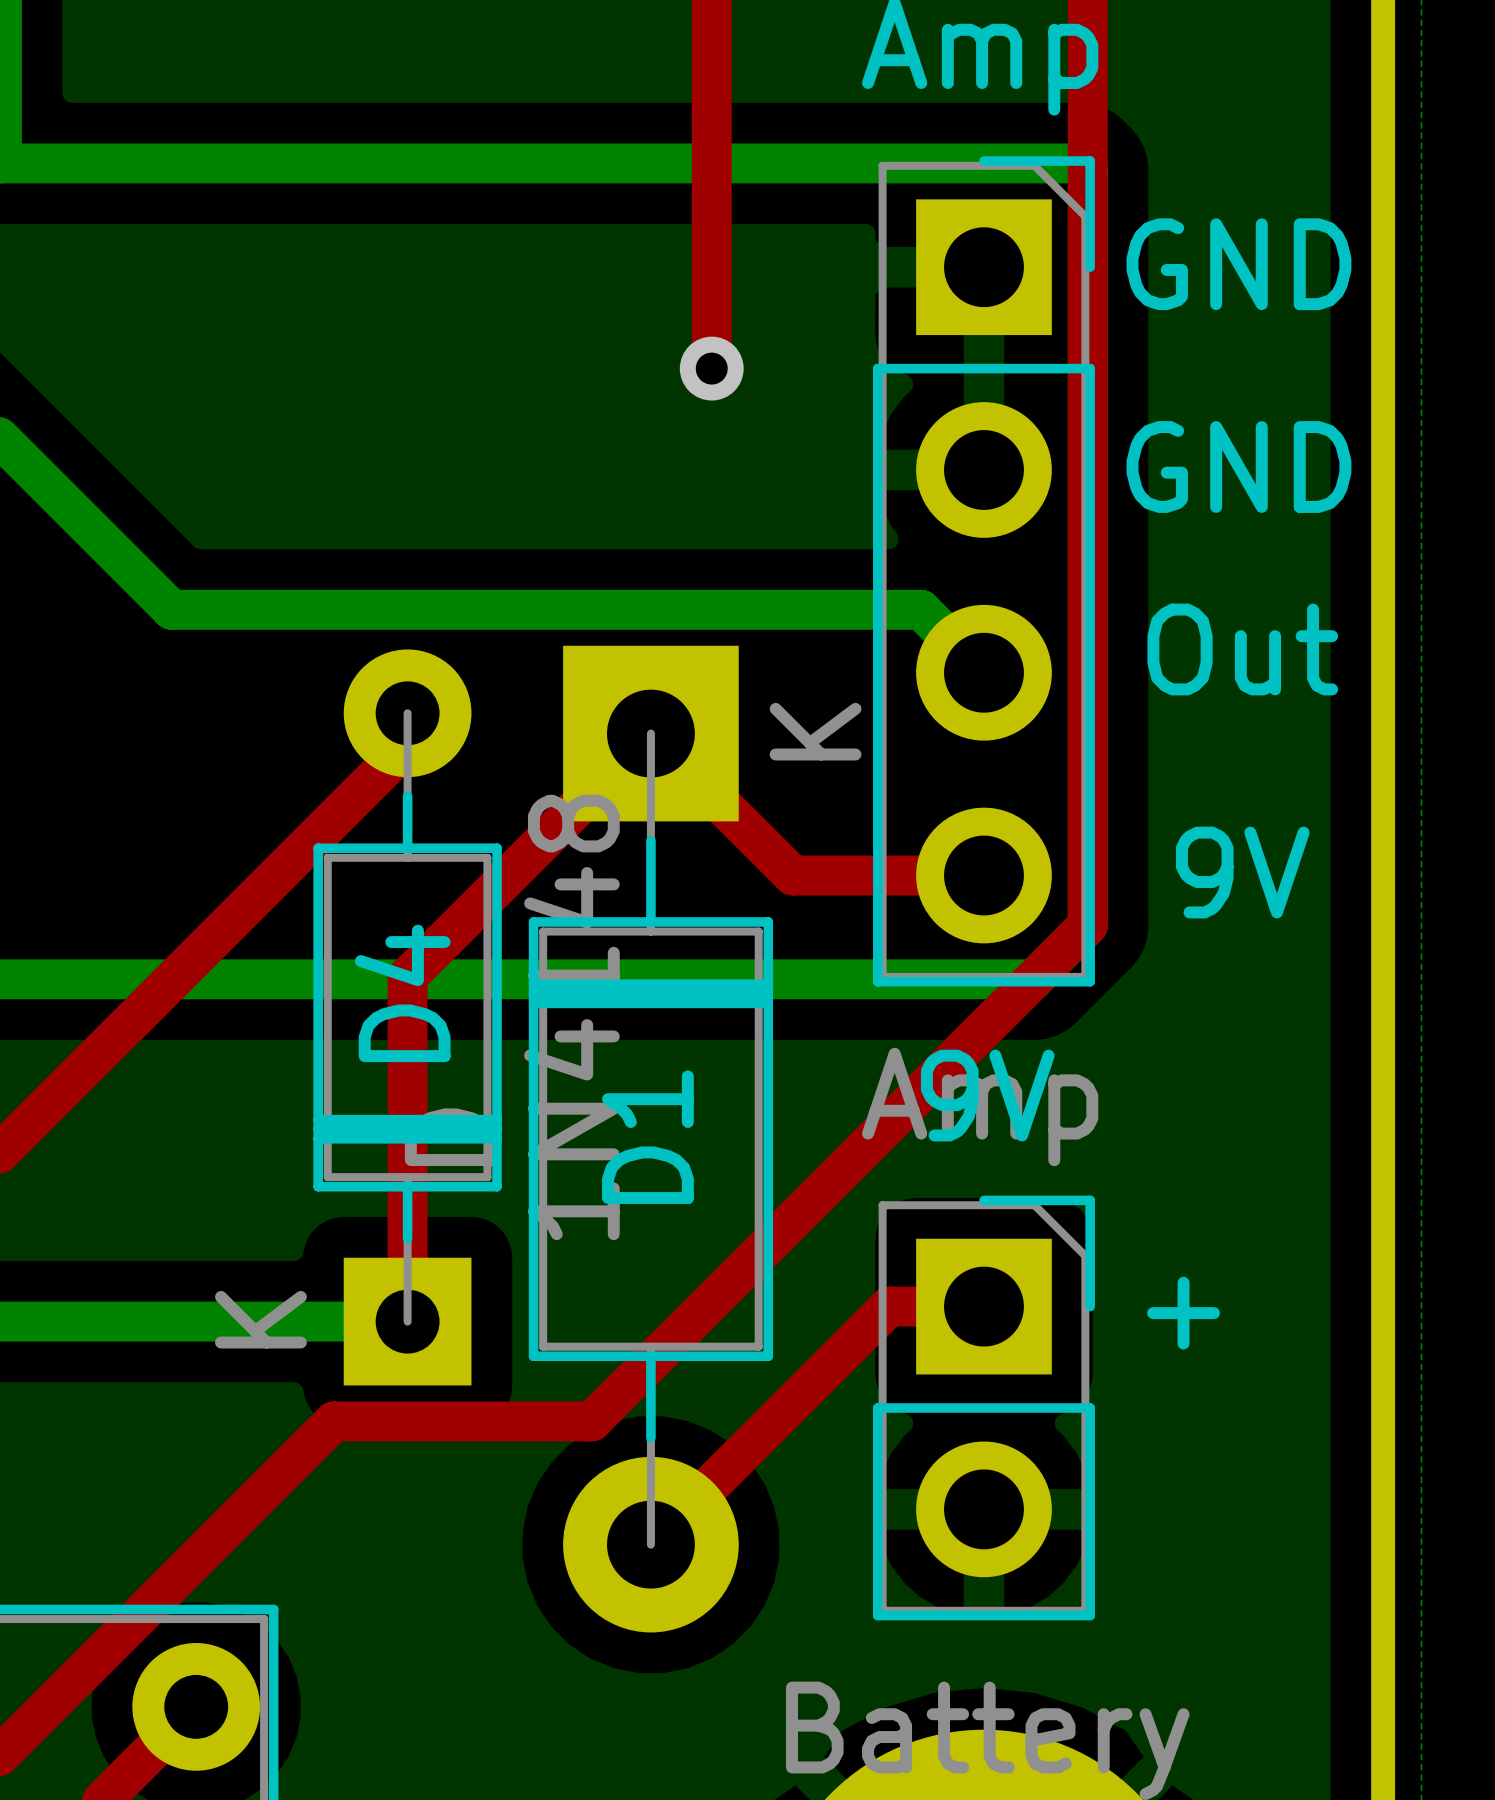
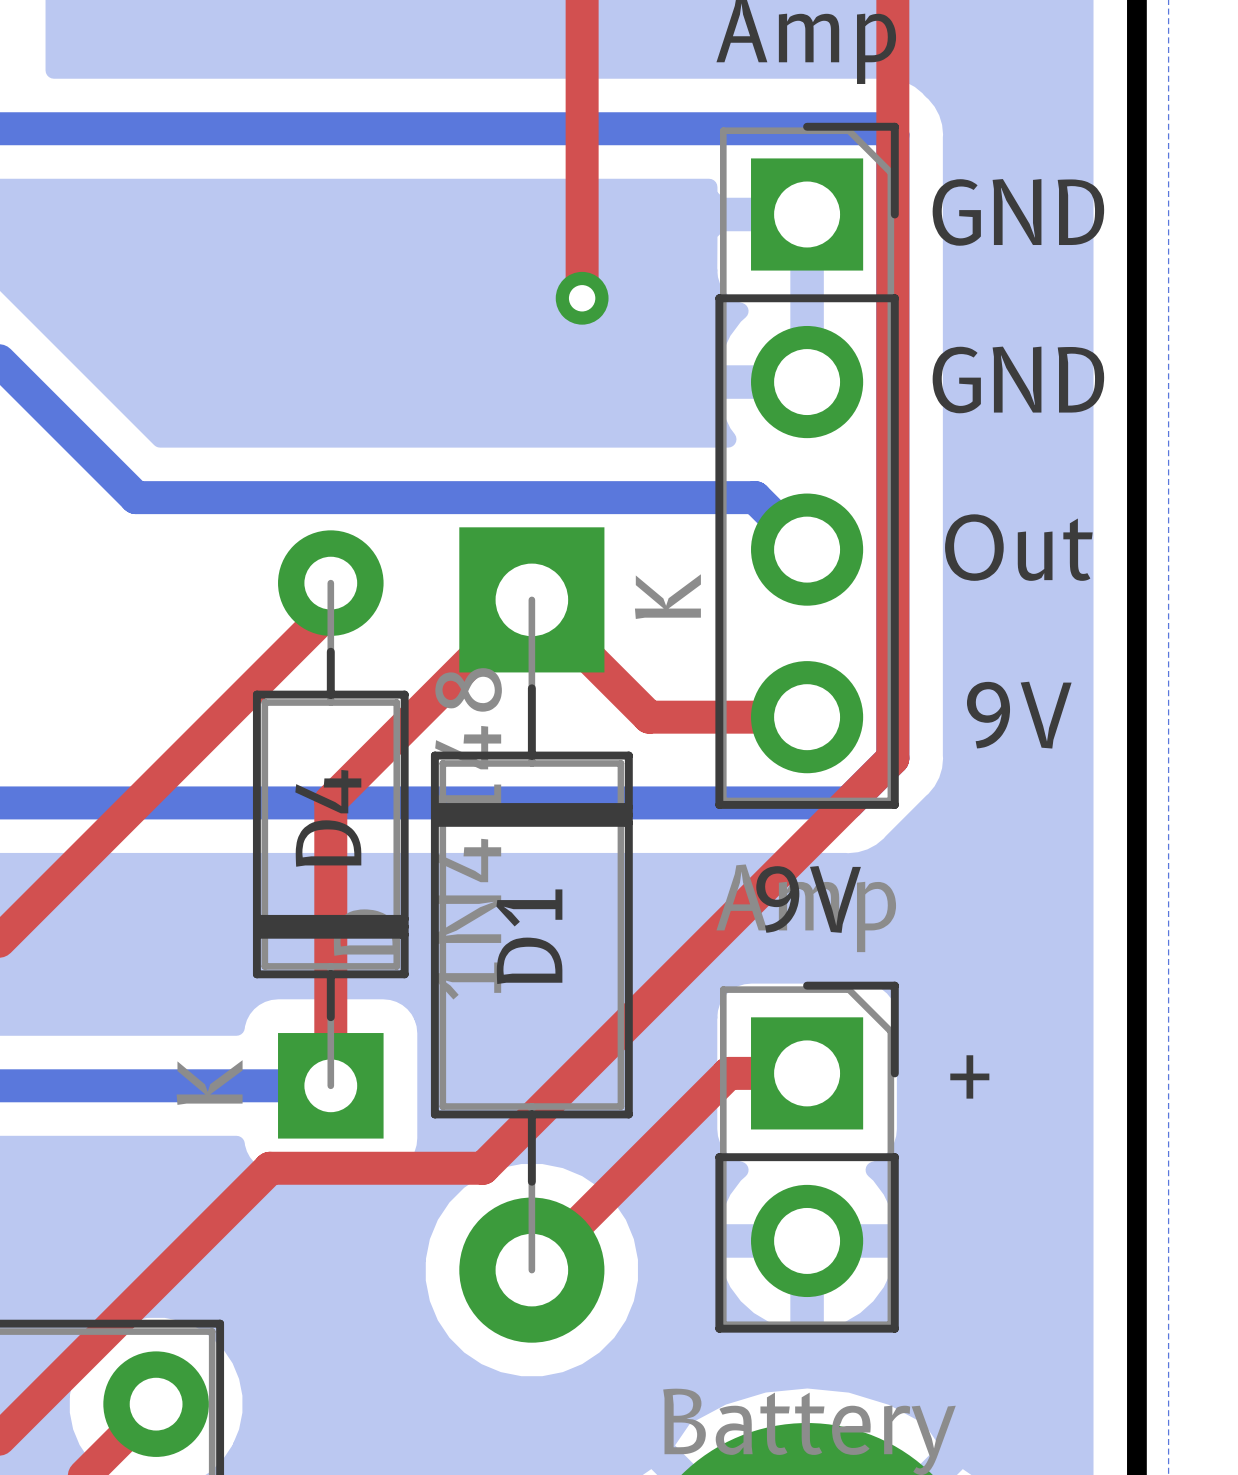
text position: Out (1242, 649) -> Out (1018, 547)

